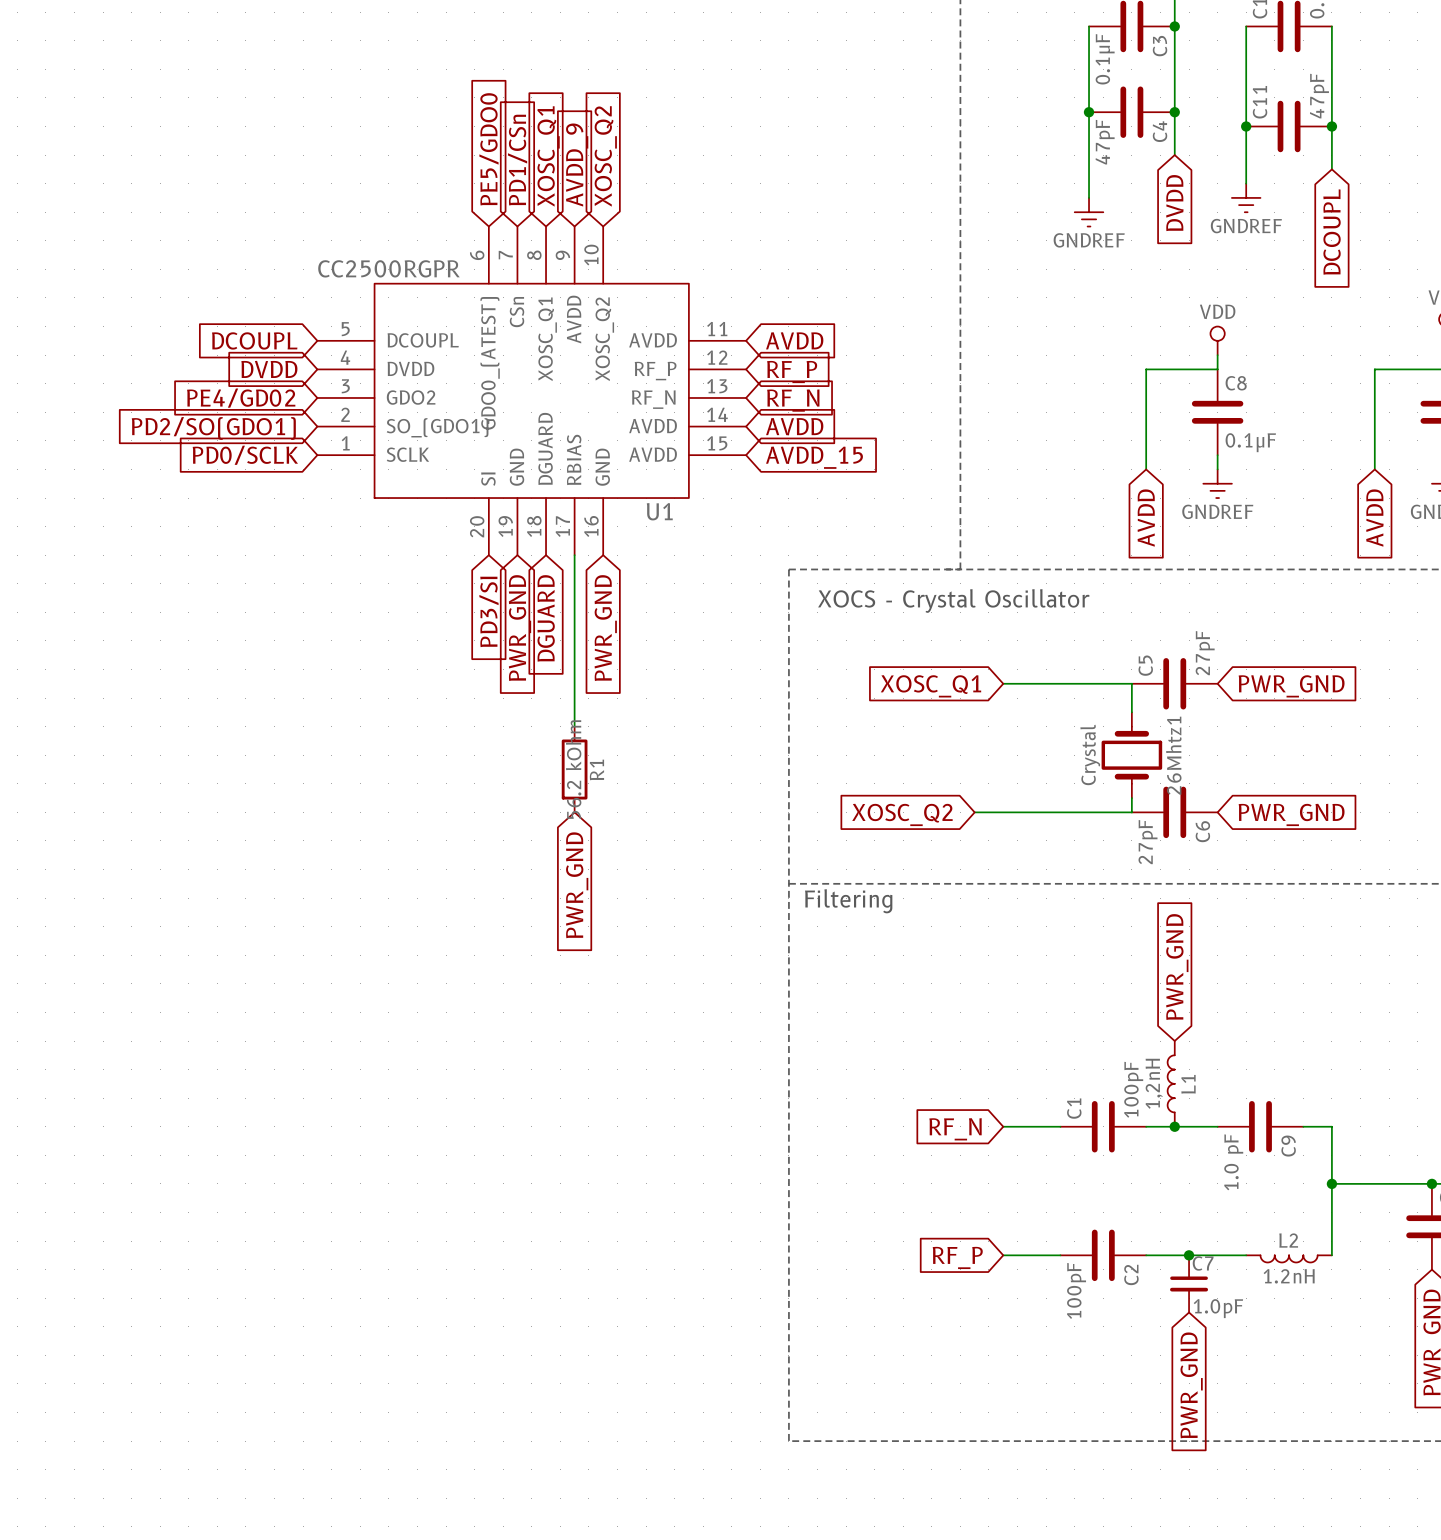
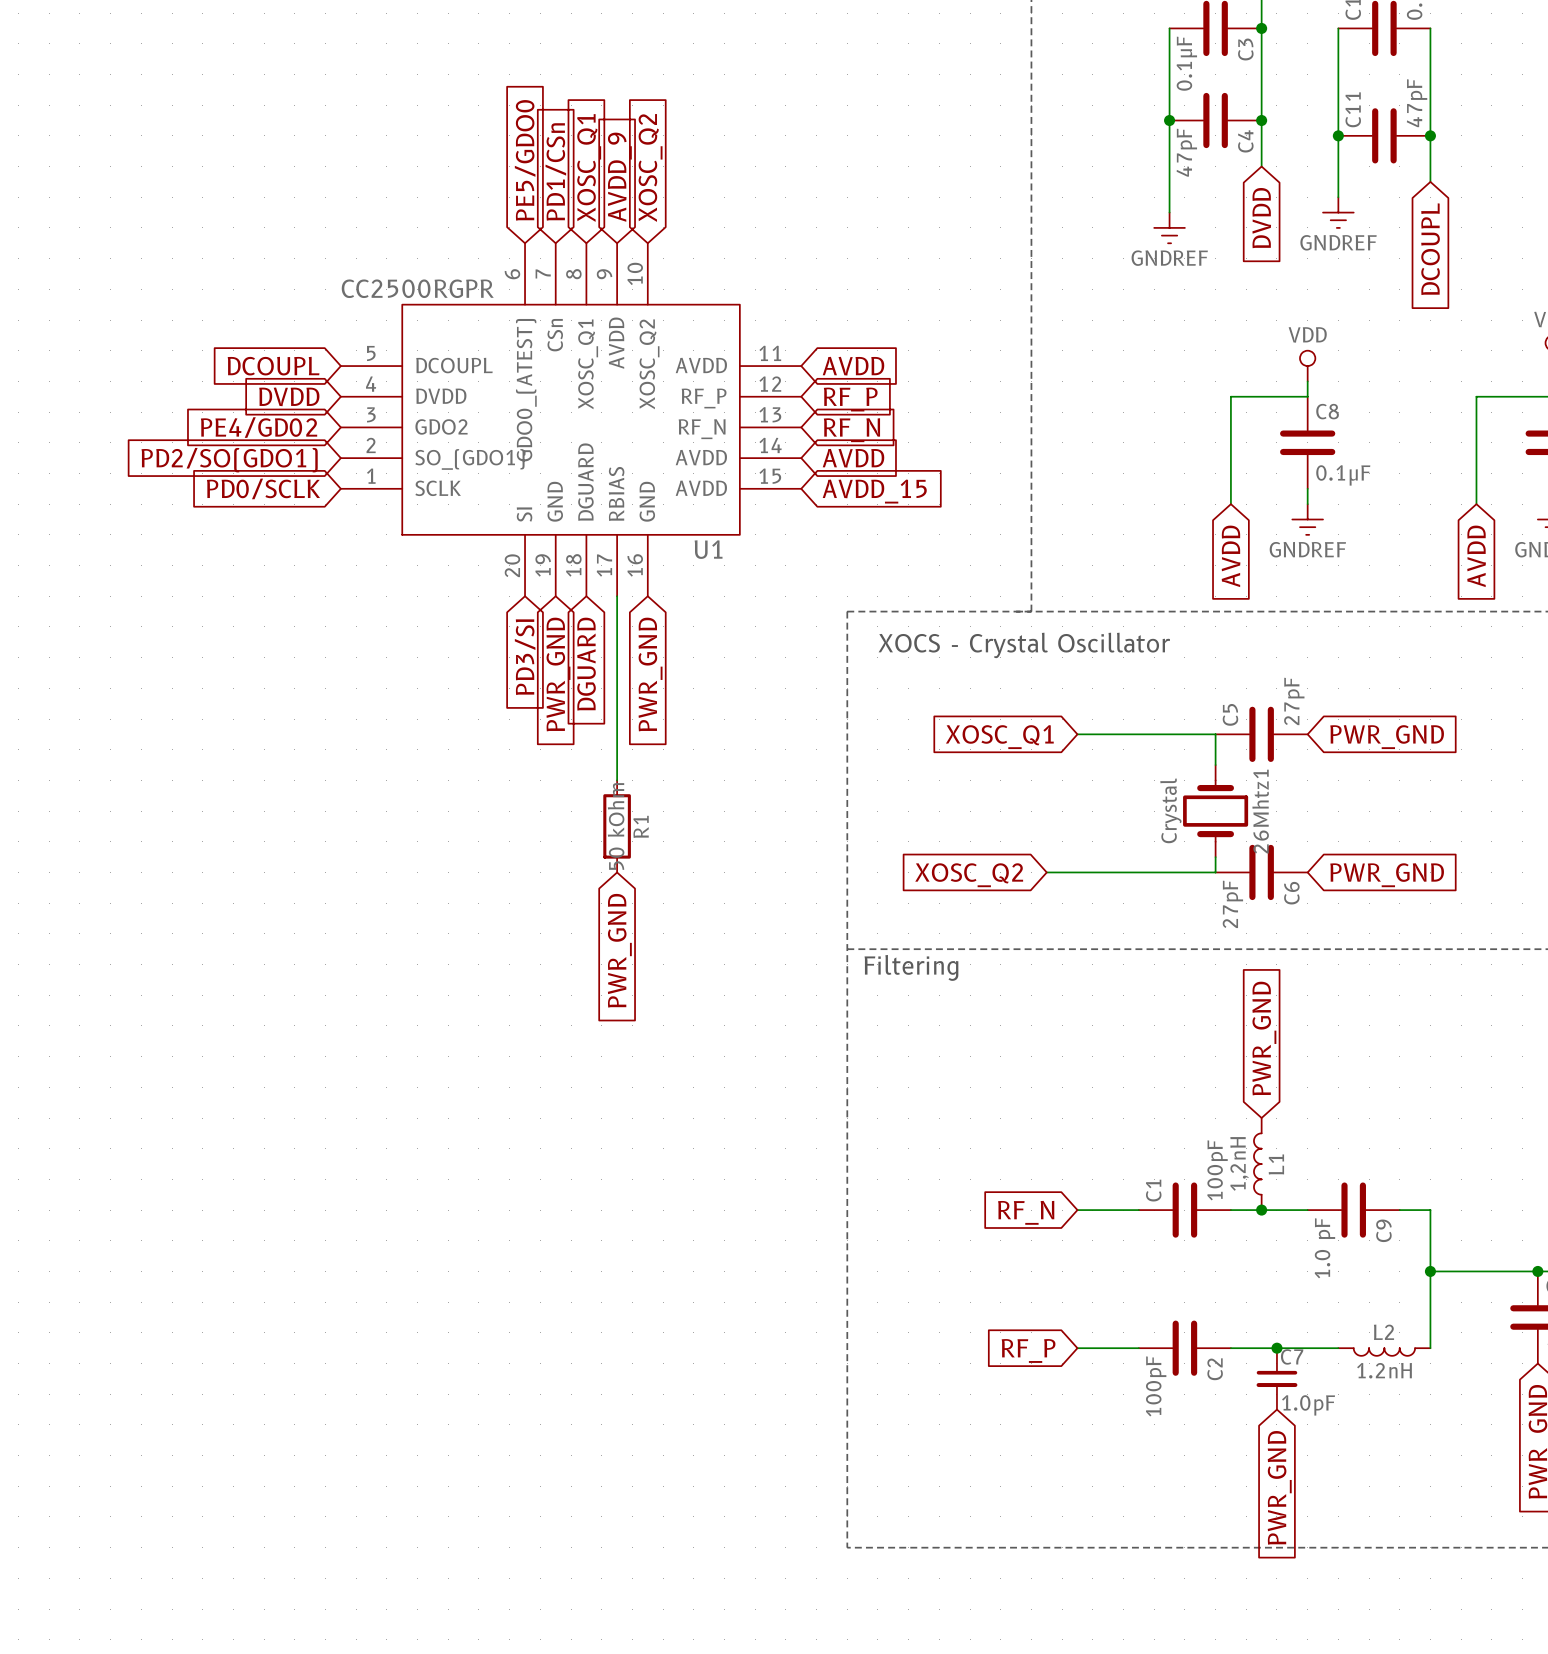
R1 value: 56.2 kOhm (573, 769) -> 50 kOhm (616, 826)

